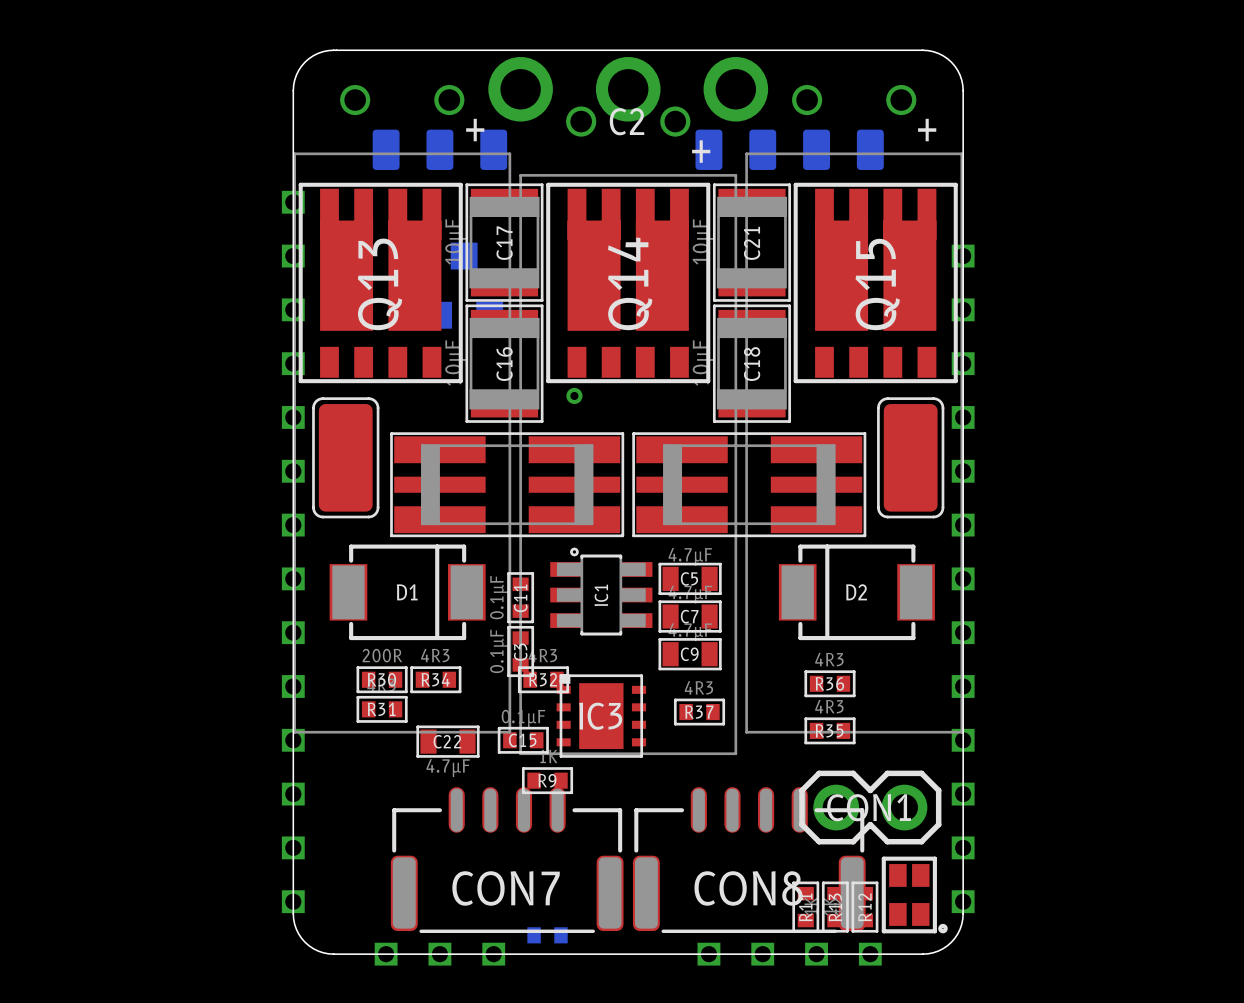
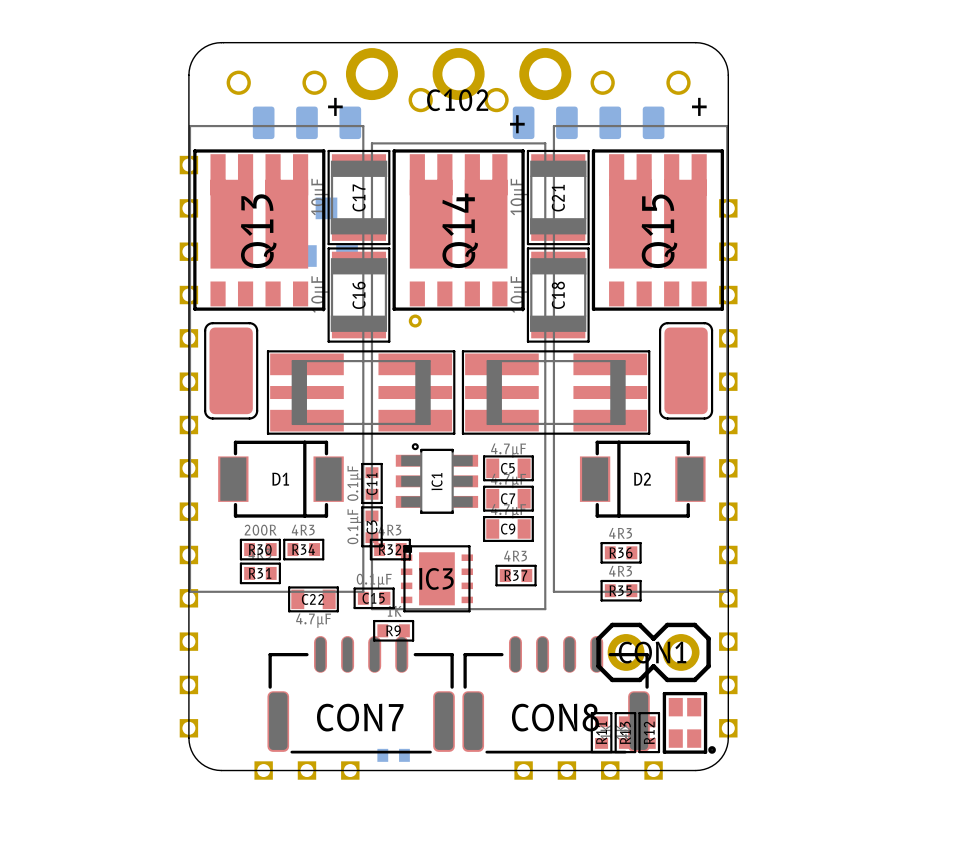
C2 name: C2 (627, 121) -> C102 (457, 100)

